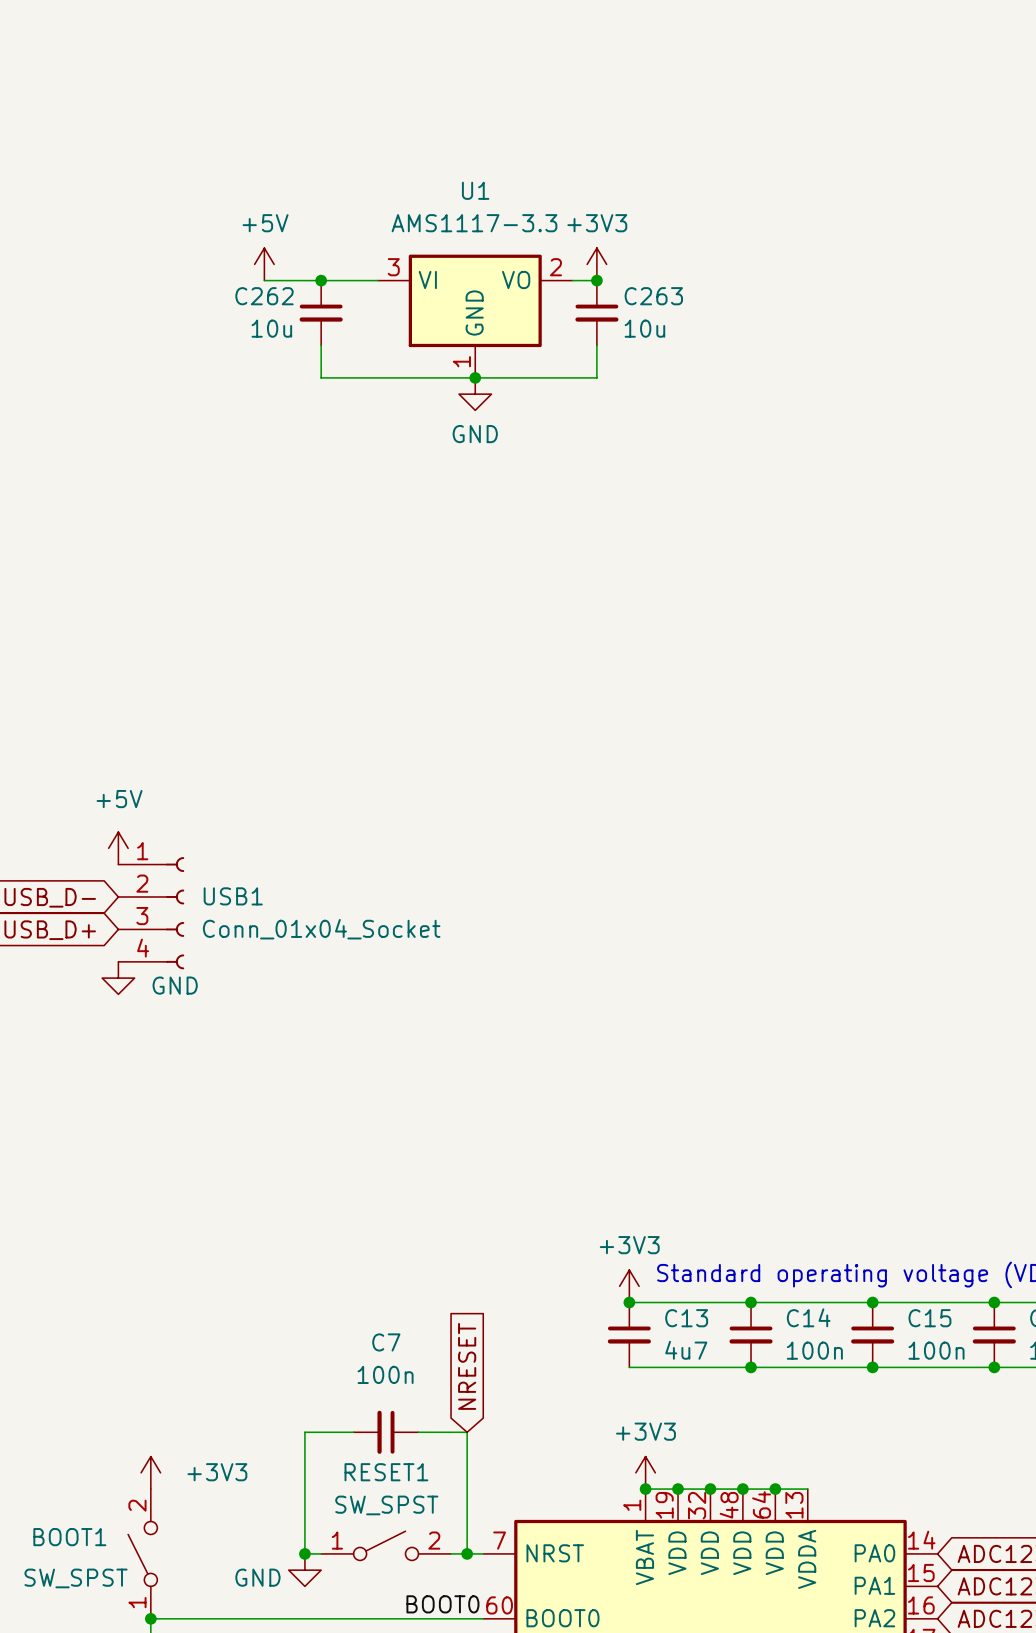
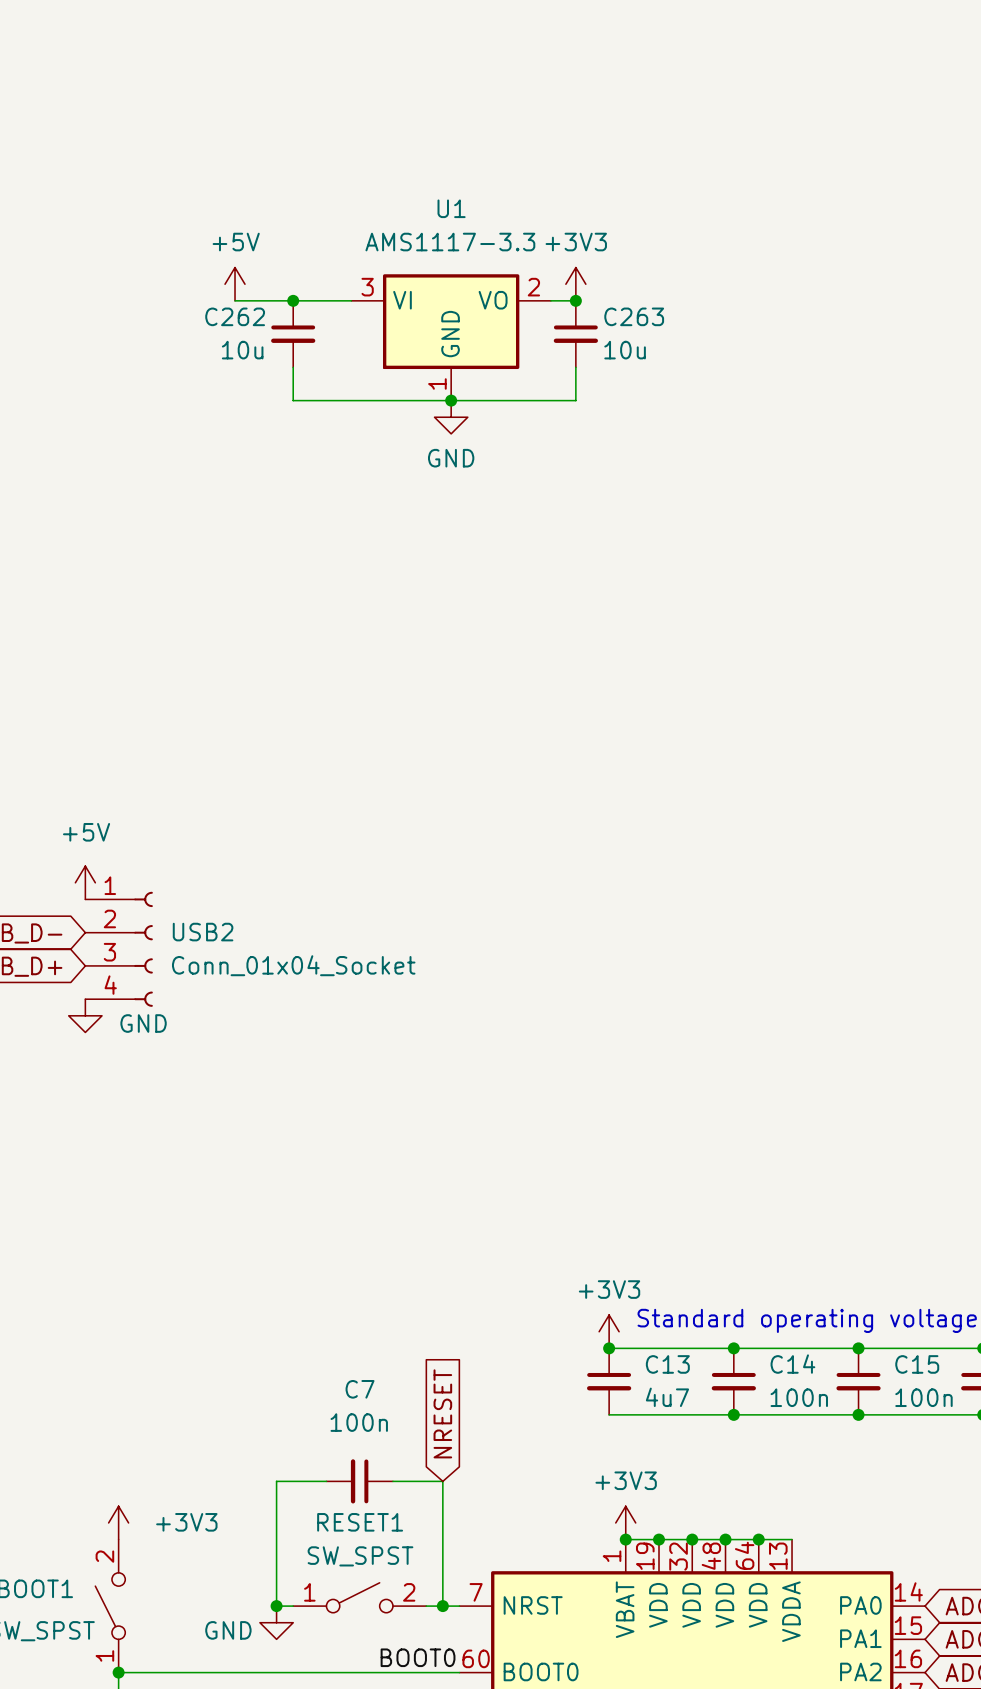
USB1 name: USB1 (233, 896) -> USB2 (203, 932)

